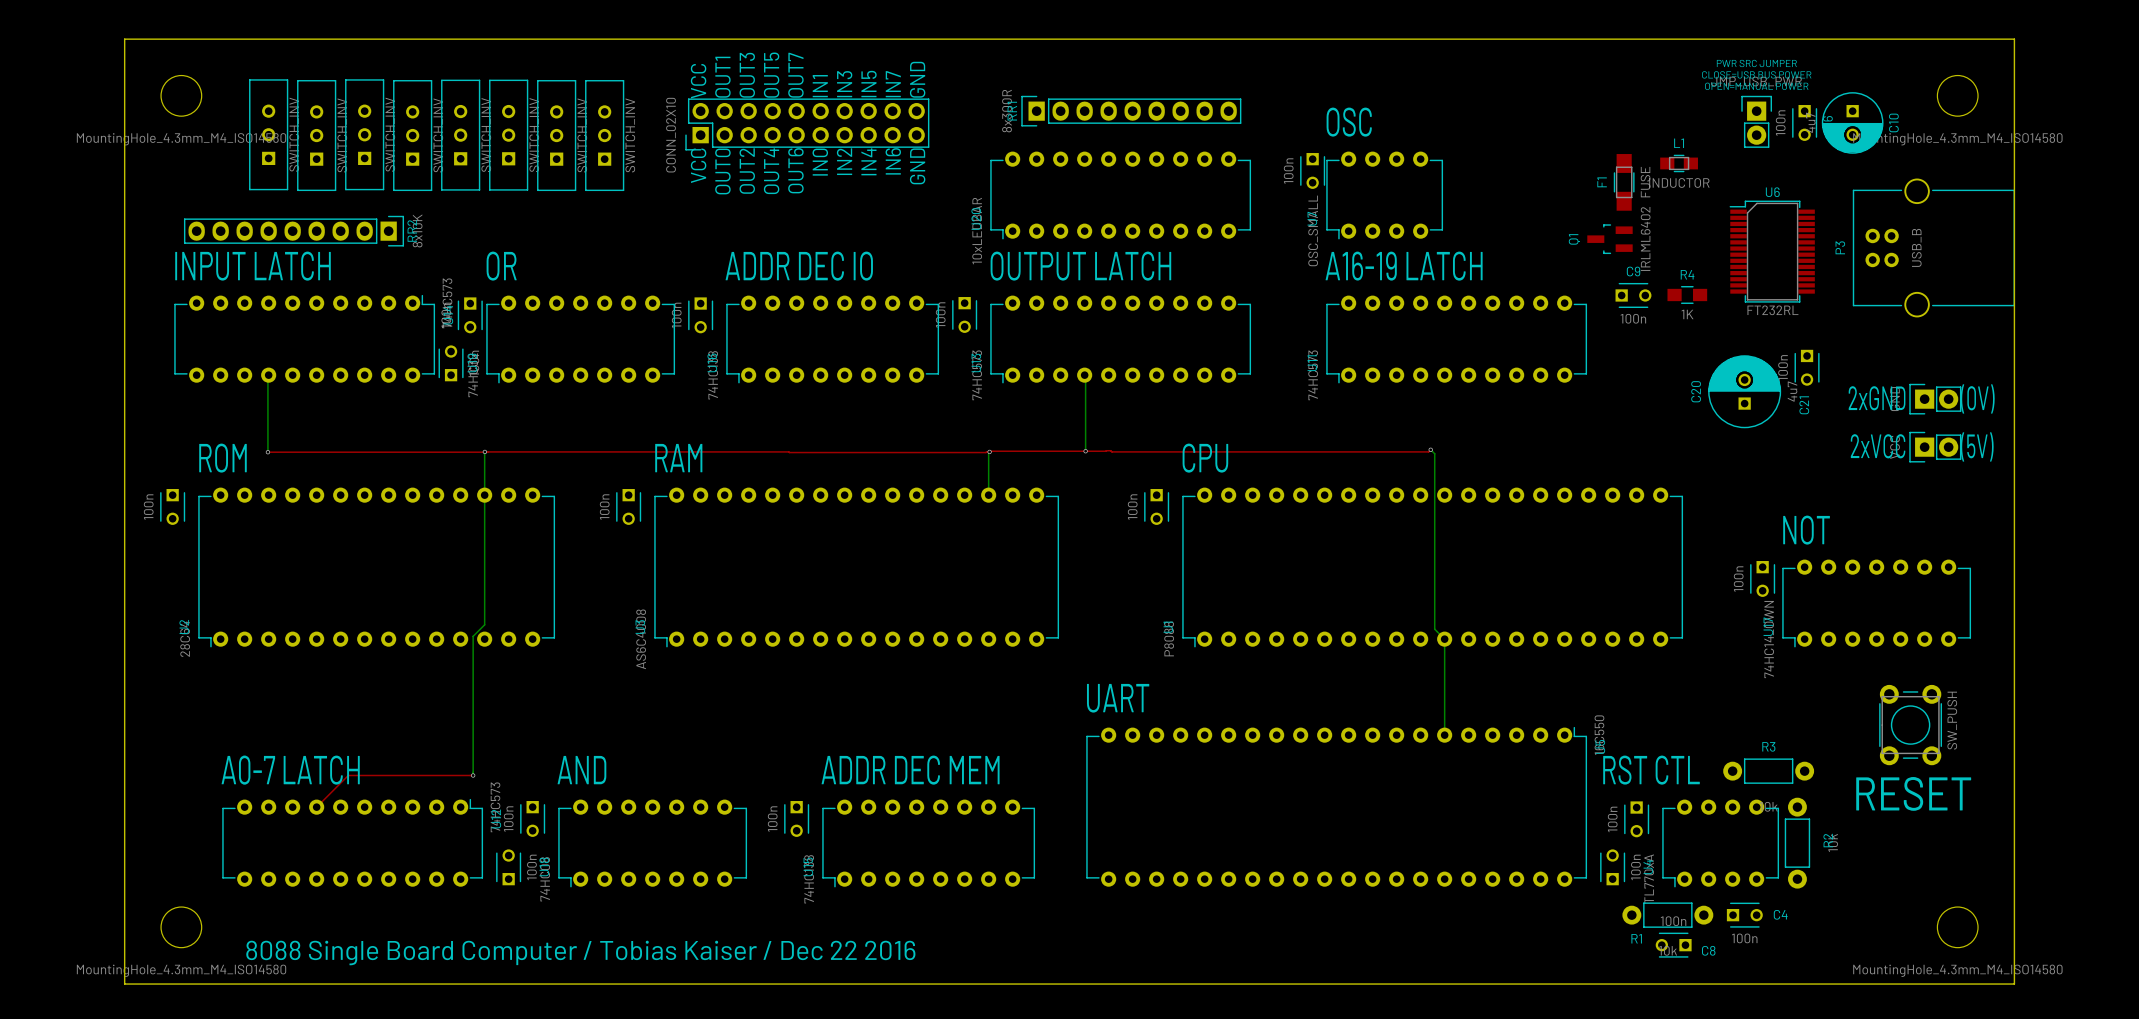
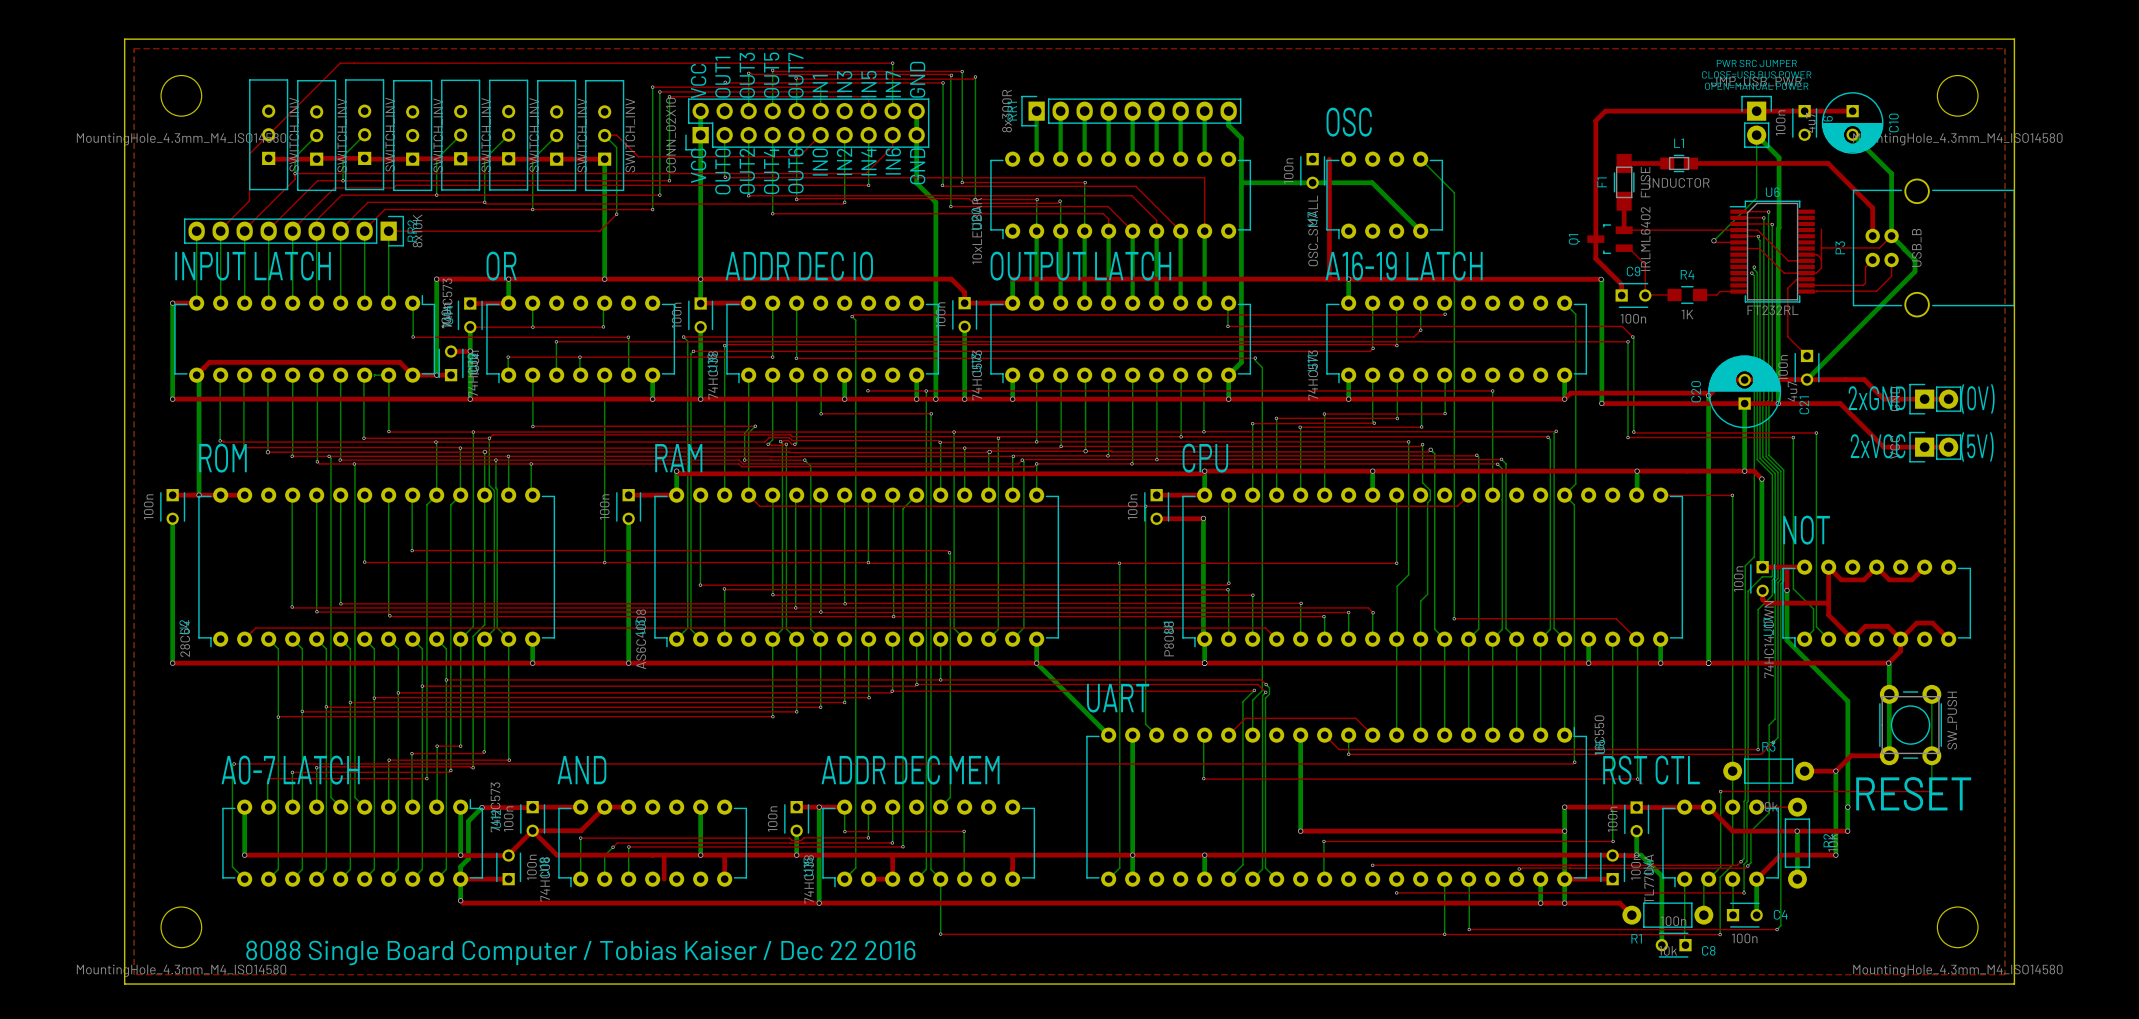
top zone outline: none -> (134, 48) (134, 974) (2004, 974) (2004, 48) (134, 48)
top track: none -> (892, 63) (340, 63) (249, 153) (249, 200) (220, 231)
bottom track: none -> (892, 63) (892, 111)
via: none -> (892, 63)
top track: none -> (772, 70) (962, 71)
bottom track: none -> (772, 70) (772, 111)
via: none -> (772, 70)
bottom track: none -> (962, 71) (962, 181)
via: none -> (962, 71)
top track: none -> (748, 73) (951, 75)
bottom track: none -> (748, 73) (748, 111)
via: none -> (748, 73)
bottom track: none -> (951, 75) (950, 206)
via: none -> (951, 75)
top track: none -> (975, 76) (973, 79) (796, 78)
bottom track: none -> (975, 76) (975, 199)
via: none -> (975, 76)
bottom track: none -> (796, 78) (796, 111)
via: none -> (796, 78)
top track: none -> (725, 82) (943, 82)
via: none -> (725, 82)
bottom track: none -> (943, 82) (942, 185)
via: none -> (943, 82)
top track: none -> (652, 87) (820, 87)
bottom track: none -> (652, 87) (652, 209)
via: none -> (652, 87)
bottom track: none -> (820, 87) (820, 111)
top track: none -> (659, 91) (844, 91)
bottom track: none -> (659, 91) (659, 195)
via: none -> (659, 91)
top track: none -> (669, 96) (865, 96) (868, 99) (868, 111)
bottom track: none -> (669, 96) (669, 180)
via: none -> (669, 96)
bottom track: none -> (700, 111) (700, 303)
bottom track: none -> (916, 111) (916, 183) (935, 202) (935, 399)
bottom track: none -> (1036, 111) (1036, 159)
bottom track: none -> (1060, 111) (1060, 159)
bottom track: none -> (1084, 111) (1084, 159)
bottom track: none -> (1108, 111) (1108, 159)
bottom track: none -> (1132, 111) (1132, 159)
bottom track: none -> (1156, 111) (1156, 159)
bottom track: none -> (1180, 111) (1180, 159)
bottom track: none -> (1204, 111) (1204, 159)
bottom track: none -> (1228, 111) (1228, 125) (1241, 138) (1241, 362) (1228, 375) (1228, 399)
top track: none -> (1852, 111) (1605, 111) (1595, 120) (1595, 258) (1621, 284) (1621, 295)
bottom track: none -> (364, 134) (343, 156) (343, 180)
bottom track: none -> (1852, 134) (1891, 173) (1891, 235) (1915, 259) (1915, 271) (1807, 379)
bottom track: none -> (316, 135) (295, 157) (295, 173)
bottom track: none -> (460, 135) (436, 159) (436, 195)
bottom track: none -> (508, 135) (484, 159) (484, 202)
bottom track: none -> (556, 135) (532, 159) (532, 209)
bottom track: none -> (604, 135) (616, 147) (616, 214)
bottom track: none -> (724, 135) (725, 177)
bottom track: none -> (748, 135) (748, 195)
bottom track: none -> (772, 135) (772, 213)
bottom track: none -> (796, 135) (796, 199)
top track: none -> (820, 135) (799, 156) (638, 156) (616, 135) (604, 135)
bottom track: none -> (844, 135) (844, 202)
bottom track: none -> (868, 135) (868, 185)
top track: none -> (892, 135) (892, 146) (865, 173) (295, 173) (295, 179) (244, 231)
top track: none -> (268, 158) (604, 159)
bottom track: none -> (604, 159) (604, 279)
top track: none -> (1329, 159) (1329, 279)
bottom track: none -> (1420, 159) (1454, 192) (1454, 618)
top track: none -> (1624, 163) (1667, 163)
top track: none -> (1690, 163) (1828, 163) (1872, 207) (1872, 235)
via: none -> (295, 173)
top track: none -> (725, 177) (1204, 177) (1204, 231)
via: none -> (725, 177)
via: none -> (343, 180)
top track: none -> (669, 180) (317, 180) (268, 231)
via: none -> (669, 180)
top track: none -> (962, 182) (1085, 182)
via: none -> (962, 182)
bottom track: none -> (1085, 182) (1084, 303)
via: none -> (1085, 182)
bottom track: none -> (1241, 184) (1242, 182) (1372, 182) (1420, 231)
top track: none -> (868, 185) (396, 185) (393, 187) (334, 187) (292, 231)
via: none -> (868, 185)
top track: none -> (942, 185) (1135, 186) (1180, 231)
via: none -> (942, 185)
via: none -> (436, 195)
top track: none -> (659, 195) (341, 195) (316, 220) (316, 231)
via: none -> (659, 195)
top track: none -> (748, 195) (1131, 195) (1156, 220) (1156, 231)
via: none -> (748, 195)
top track: none -> (796, 199) (969, 198) (973, 203) (1057, 203) (1060, 201)
via: none -> (796, 199)
top track: none -> (975, 199) (1037, 199)
via: none -> (975, 199)
bottom track: none -> (1037, 199) (1036, 303)
via: none -> (1037, 199)
bottom track: none -> (1060, 201) (1060, 303)
via: none -> (1060, 201)
top track: none -> (1624, 201) (1624, 230)
via: none -> (484, 202)
top track: none -> (844, 202) (843, 204) (486, 204) (484, 202) (368, 202) (340, 231)
via: none -> (844, 202)
top track: none -> (951, 205) (1108, 206) (1132, 231)
via: none -> (950, 206)
via: none -> (532, 209)
top track: none -> (652, 209) (384, 209) (364, 231)
via: none -> (652, 209)
top track: none -> (1738, 211) (1768, 211)
bottom track: none -> (1768, 211) (1768, 400) (1766, 402) (1766, 456) (1780, 471) (1780, 579) (1778, 582) (1778, 737) (1773, 742)
via: none -> (1768, 211)
top track: none -> (772, 213) (1103, 213) (1108, 219) (1108, 231)
via: none -> (772, 213)
top track: none -> (616, 214) (599, 231) (388, 231)
via: none -> (616, 214)
top track: none -> (1738, 217) (1763, 217)
bottom track: none -> (1763, 217) (1762, 457) (1778, 472) (1778, 578) (1775, 581) (1775, 719) (1769, 725) (1769, 812) (1750, 831) (1750, 862) (1747, 865)
via: none -> (1763, 217)
top track: none -> (1738, 223) (1772, 224)
bottom track: none -> (1772, 224) (1772, 400) (1768, 403) (1768, 455) (1783, 470) (1783, 580) (1780, 583) (1780, 925) (1777, 929)
via: none -> (1772, 224)
top track: none -> (1821, 229) (1821, 267) (1816, 273) (1784, 273) (1759, 248) (1738, 248)
top track: none -> (1624, 230) (1757, 230) (1788, 260) (1806, 260)
bottom track: none -> (196, 231) (196, 303)
bottom track: none -> (220, 231) (220, 303)
bottom track: none -> (244, 231) (244, 303)
bottom track: none -> (268, 231) (268, 303)
bottom track: none -> (292, 231) (292, 303)
bottom track: none -> (316, 231) (316, 303)
bottom track: none -> (340, 231) (340, 303)
bottom track: none -> (364, 231) (364, 303)
bottom track: none -> (388, 231) (388, 303)
bottom track: none -> (1108, 231) (1108, 303)
bottom track: none -> (1132, 231) (1132, 303)
bottom track: none -> (1156, 231) (1156, 303)
bottom track: none -> (1180, 231) (1180, 303)
bottom track: none -> (1204, 231) (1204, 303)
top track: none -> (1891, 235) (1879, 247) (1821, 247)
top track: none -> (1738, 236) (1758, 236)
bottom track: none -> (1758, 236) (1760, 240) (1760, 458) (1775, 473) (1775, 577) (1772, 580) (1772, 595) (1758, 609) (1758, 749)
via: none -> (1758, 236)
top track: none -> (1713, 240) (1715, 242) (1738, 242)
bottom track: none -> (1713, 240) (1756, 198) (1756, 135) (1779, 157) (1778, 403)
via: none -> (1713, 240)
top track: none -> (1624, 248) (1628, 248) (1645, 264) (1645, 295) (1674, 294)
top track: none -> (1806, 254) (1817, 254) (1821, 258)
top track: none -> (1872, 259) (1865, 267) (1865, 283) (1863, 285) (1806, 285)
top track: none -> (1891, 259) (1891, 276) (1876, 291) (1806, 291)
via: none -> (1754, 267)
bottom track: none -> (1754, 269) (1754, 267) (1757, 272) (1757, 459) (1772, 474) (1772, 576) (1762, 576) (1748, 591) (1748, 801) (1746, 861) (1744, 864) (1744, 892)
bottom track: none -> (1751, 273) (1754, 275) (1754, 556) (1745, 565) (1745, 800) (1744, 858) (1741, 861)
via: none -> (1751, 273)
top track: none -> (436, 279) (951, 279) (964, 292) (964, 303) (1012, 303)
bottom track: none -> (436, 279) (436, 375)
via: none -> (436, 279)
bottom track: none -> (508, 279) (508, 303)
via: none -> (508, 279)
via: none -> (604, 279)
via: none -> (700, 279)
top track: none -> (1012, 279) (1601, 279)
bottom track: none -> (1012, 279) (1012, 303)
bottom track: none -> (1348, 279) (1348, 303)
via: none -> (1348, 279)
bottom track: none -> (1601, 279) (1601, 403)
via: none -> (1601, 279)
top track: none -> (1806, 279) (1796, 279) (1787, 288) (1787, 336) (1807, 355)
top track: none -> (1738, 291) (1720, 291) (1716, 294) (1700, 294)
top track: none -> (172, 303) (196, 303)
bottom track: none -> (172, 303) (172, 399)
via: none -> (172, 303)
bottom track: none -> (412, 303) (413, 336)
top track: none -> (508, 303) (470, 303)
bottom track: none -> (532, 303) (532, 327)
bottom track: none -> (604, 303) (603, 326)
top track: none -> (748, 303) (700, 303)
bottom track: none -> (772, 303) (772, 357)
bottom track: none -> (796, 303) (796, 358)
bottom track: none -> (1228, 303) (1227, 326)
bottom track: none -> (1372, 303) (1373, 348)
bottom track: none -> (1396, 303) (1396, 345)
bottom track: none -> (1420, 303) (1420, 330)
bottom track: none -> (1564, 303) (1575, 314) (1575, 484) (1564, 495) (1574, 504) (1574, 762)
top track: none -> (1445, 314) (853, 314) (852, 316)
via: none -> (1445, 314)
bottom track: none -> (852, 316) (855, 320) (855, 868) (844, 879)
via: none -> (852, 316)
top track: none -> (603, 326) (470, 327)
via: none -> (603, 326)
bottom track: none -> (964, 326) (964, 399)
top track: none -> (1227, 326) (1622, 326) (1632, 336)
via: none -> (1227, 326)
bottom track: none -> (470, 327) (470, 399)
via: none -> (532, 327)
bottom track: none -> (700, 327) (700, 399)
top track: none -> (1420, 330) (1413, 336) (683, 336)
via: none -> (1420, 330)
top track: none -> (413, 336) (628, 337)
via: none -> (413, 336)
bottom track: none -> (683, 336) (687, 341) (687, 628) (676, 639)
via: none -> (683, 336)
bottom track: none -> (1632, 336) (1633, 432)
via: none -> (1632, 336)
bottom track: none -> (628, 337) (628, 375)
via: none -> (628, 337)
top track: none -> (556, 341) (1628, 341)
bottom track: none -> (556, 341) (556, 375)
via: none -> (556, 341)
bottom track: none -> (1628, 341) (1628, 437)
via: none -> (1628, 341)
top track: none -> (724, 345) (1396, 345)
bottom track: none -> (724, 345) (724, 495)
via: none -> (724, 345)
via: none -> (1396, 345)
top track: none -> (1373, 348) (1370, 351) (693, 351)
via: none -> (1373, 348)
top track: none -> (470, 351) (451, 351)
via: none -> (470, 351)
bottom track: none -> (693, 351) (690, 353) (690, 629) (700, 639)
via: none -> (693, 351)
top track: none -> (508, 357) (772, 357)
bottom track: none -> (508, 357) (508, 375)
via: none -> (508, 357)
bottom track: none -> (579, 357) (580, 375)
via: none -> (579, 357)
via: none -> (772, 357)
via: none -> (796, 358)
top track: none -> (1255, 358) (796, 358)
bottom track: none -> (1255, 358) (1262, 367) (1262, 690) (1252, 700) (1252, 735)
via: none -> (1255, 358)
top track: none -> (196, 375) (209, 362) (399, 362) (412, 375) (451, 375)
bottom track: none -> (196, 375) (199, 377) (199, 495)
bottom track: none -> (220, 375) (220, 440)
bottom track: none -> (244, 375) (243, 447)
bottom track: none -> (292, 375) (292, 456)
bottom track: none -> (316, 375) (317, 461)
bottom track: none -> (340, 375) (340, 460)
bottom track: none -> (364, 375) (363, 438)
via: none -> (436, 375)
bottom track: none -> (532, 375) (532, 426)
bottom track: none -> (604, 375) (604, 562)
bottom track: none -> (652, 375) (652, 399)
bottom track: none -> (748, 375) (748, 428) (744, 433) (744, 460)
bottom track: none -> (772, 375) (772, 439) (768, 444)
bottom track: none -> (796, 375) (796, 442) (794, 444)
bottom track: none -> (820, 375) (821, 413)
bottom track: none -> (844, 375) (844, 399)
bottom track: none -> (916, 375) (916, 399)
bottom track: none -> (1012, 375) (1012, 399)
bottom track: none -> (1036, 375) (1036, 441)
bottom track: none -> (1060, 375) (1061, 446)
bottom track: none -> (1108, 375) (1107, 455)
bottom track: none -> (1132, 375) (1131, 463)
bottom track: none -> (1156, 375) (1156, 459)
bottom track: none -> (1180, 375) (1181, 436)
bottom track: none -> (1204, 375) (1203, 431)
bottom track: none -> (1348, 375) (1348, 399)
bottom track: none -> (1372, 375) (1372, 421) (1374, 423)
bottom track: none -> (1396, 375) (1397, 418)
bottom track: none -> (1420, 375) (1421, 426)
bottom track: none -> (1444, 375) (1445, 413)
bottom track: none -> (1564, 375) (1564, 399)
bottom track: none -> (374, 376) (374, 374) (388, 375) (388, 431)
top track: none -> (867, 390) (1492, 390)
via: none -> (867, 390)
via: none -> (926, 390)
bottom track: none -> (1492, 390) (1492, 495)
via: none -> (1492, 390)
bottom track: none -> (926, 391) (926, 869) (916, 879)
bottom track: none -> (1708, 395) (1708, 663)
via: none -> (1708, 395)
top track: none -> (172, 399) (1564, 399) (1570, 393) (1706, 393) (1708, 395) (1724, 379) (1745, 379) (1864, 379) (1883, 399) (1948, 399)
via: none -> (172, 399)
via: none -> (470, 399)
via: none -> (652, 399)
via: none -> (700, 399)
via: none -> (844, 399)
via: none -> (916, 399)
via: none -> (935, 399)
via: none -> (964, 399)
via: none -> (1012, 399)
via: none -> (1228, 399)
via: none -> (1348, 399)
via: none -> (1564, 399)
top track: none -> (1601, 403) (1840, 403) (1883, 447) (1948, 447)
via: none -> (1601, 403)
bottom track: none -> (1744, 403) (1744, 471)
via: none -> (1778, 403)
top track: none -> (821, 413) (931, 413)
via: none -> (821, 413)
bottom track: none -> (931, 413) (930, 869) (940, 879) (940, 934)
via: none -> (931, 413)
top track: none -> (1445, 413) (1324, 414)
via: none -> (1445, 413)
bottom track: none -> (1324, 414) (1324, 495)
via: none -> (1324, 414)
top track: none -> (1276, 418) (1397, 418)
bottom track: none -> (1276, 418) (1276, 495)
via: none -> (1276, 418)
via: none -> (1397, 418)
bottom track: none -> (1252, 423) (1252, 495)
via: none -> (1252, 423)
top track: none -> (1374, 423) (1252, 423)
via: none -> (1374, 423)
via: none -> (532, 426)
top track: none -> (755, 426) (532, 426)
bottom track: none -> (755, 426) (748, 432) (748, 495)
via: none -> (755, 426)
top track: none -> (1421, 426) (1300, 427)
via: none -> (1421, 426)
bottom track: none -> (1300, 427) (1300, 495)
via: none -> (1300, 427)
via: none -> (388, 431)
via: none -> (1203, 431)
top track: none -> (1556, 431) (388, 431)
bottom track: none -> (1556, 431) (1554, 433) (1554, 628) (1564, 639) (1564, 735)
via: none -> (1556, 431)
bottom track: none -> (473, 432) (473, 626) (460, 639) (460, 746)
via: none -> (473, 432)
bottom track: none -> (954, 432) (954, 628) (964, 639)
via: none -> (954, 432)
top track: none -> (1633, 432) (1816, 432)
via: none -> (1633, 432)
bottom track: none -> (1816, 432) (1816, 626) (1828, 639)
via: none -> (1816, 432)
top track: none -> (792, 436) (790, 434) (492, 434) (489, 438) (363, 438)
top track: none -> (792, 436) (1548, 437)
via: none -> (1181, 436)
bottom track: none -> (1548, 437) (1550, 439) (1550, 629) (1540, 639)
via: none -> (1548, 437)
top track: none -> (1628, 437) (1793, 437)
via: none -> (1628, 437)
bottom track: none -> (1793, 437) (1793, 588) (1813, 609) (1813, 630) (1804, 639)
via: none -> (1793, 437)
via: none -> (363, 438)
bottom track: none -> (489, 438) (489, 485) (494, 490) (494, 629) (484, 639) (484, 751)
via: none -> (489, 438)
bottom track: none -> (998, 438) (998, 629) (988, 639)
via: none -> (998, 438)
top track: none -> (220, 440) (764, 442) (769, 437) (789, 437) (792, 440) (938, 440) (940, 442) (1408, 441)
via: none -> (220, 440)
top track: none -> (780, 441) (788, 440) (794, 444)
bottom track: none -> (780, 441) (782, 443) (782, 629) (772, 639) (772, 716)
via: none -> (780, 441)
via: none -> (1036, 441)
bottom track: none -> (1408, 441) (1408, 574) (1397, 586) (1396, 735)
via: none -> (1408, 441)
bottom track: none -> (435, 442) (436, 495) (426, 504) (426, 778)
via: none -> (435, 442)
bottom track: none -> (940, 442) (940, 495)
via: none -> (940, 442)
top track: none -> (768, 444) (786, 444)
via: none -> (768, 444)
bottom track: none -> (786, 444) (786, 628) (796, 639) (796, 711)
via: none -> (786, 444)
via: none -> (794, 444)
top track: none -> (1422, 444) (1420, 446) (1061, 446) (1059, 448) (243, 447)
bottom track: none -> (1422, 444) (1422, 482) (1430, 490) (1430, 499) (1427, 502) (1427, 594) (1420, 601) (1420, 735)
via: none -> (1422, 444)
via: none -> (1061, 446)
bottom track: none -> (460, 448) (460, 495) (450, 504) (450, 770)
via: none -> (460, 448)
bottom track: none -> (964, 448) (964, 495)
via: none -> (964, 448)
via: none -> (1107, 455)
top track: none -> (1476, 455) (292, 456)
bottom track: none -> (1476, 455) (1478, 457) (1478, 629) (1468, 639) (1468, 735)
via: none -> (1476, 455)
via: none -> (292, 456)
bottom track: none -> (329, 456) (330, 458) (330, 797) (340, 807)
via: none -> (329, 456)
bottom track: none -> (508, 456) (508, 495)
via: none -> (508, 456)
bottom track: none -> (1013, 456) (1012, 495)
via: none -> (1013, 456)
via: none -> (1156, 459)
top track: none -> (1501, 459) (1022, 459) (1018, 463) (742, 463) (739, 460) (340, 460)
bottom track: none -> (1501, 459) (1506, 463) (1506, 628) (1516, 639) (1516, 735)
via: none -> (1501, 459)
via: none -> (340, 460)
bottom track: none -> (495, 460) (497, 627) (508, 639) (509, 760)
via: none -> (495, 460)
top track: none -> (744, 460) (770, 460)
via: none -> (744, 460)
top track: none -> (770, 460) (802, 460)
bottom track: none -> (804, 460) (810, 466) (810, 629) (820, 639) (820, 707)
via: none -> (804, 460)
bottom track: none -> (1022, 460) (1023, 461) (1023, 627) (1012, 639)
via: none -> (1022, 460)
top track: none -> (317, 461) (319, 463) (738, 463) (741, 466) (1033, 466) (1036, 463) (1497, 464)
via: none -> (317, 461)
bottom track: none -> (354, 463) (354, 797) (364, 807)
via: none -> (354, 463)
bottom track: none -> (531, 463) (532, 495)
via: none -> (531, 463)
bottom track: none -> (1036, 463) (1036, 495)
via: none -> (1036, 463)
via: none -> (1131, 463)
bottom track: none -> (1497, 464) (1502, 468) (1502, 499)
via: none -> (1497, 464)
top track: none -> (676, 471) (679, 473) (1754, 471) (1761, 479)
bottom track: none -> (676, 471) (676, 495)
via: none -> (676, 471)
bottom track: none -> (1204, 471) (1204, 495)
via: none -> (1204, 471)
bottom track: none -> (1372, 471) (1372, 495)
via: none -> (1372, 471)
bottom track: none -> (1637, 471) (1636, 495)
via: none -> (1637, 471)
via: none -> (1744, 471)
bottom track: none -> (1761, 479) (1762, 567)
via: none -> (1761, 479)
top track: none -> (172, 495) (244, 495)
via: none -> (199, 495)
bottom track: none -> (292, 495) (292, 606)
bottom track: none -> (316, 495) (316, 611)
bottom track: none -> (340, 495) (340, 603)
bottom track: none -> (364, 495) (364, 562)
bottom track: none -> (388, 495) (389, 615)
bottom track: none -> (412, 495) (412, 550)
top track: none -> (628, 495) (676, 495)
bottom track: none -> (700, 495) (700, 585)
top track: none -> (748, 495) (759, 506) (1457, 506) (1468, 495)
bottom track: none -> (772, 495) (772, 594)
bottom track: none -> (796, 495) (795, 607)
bottom track: none -> (820, 495) (820, 612)
bottom track: none -> (844, 495) (845, 603)
bottom track: none -> (868, 495) (868, 562)
bottom track: none -> (892, 495) (893, 616)
bottom track: none -> (916, 495) (902, 508) (902, 846)
top track: none -> (1156, 495) (1204, 495)
bottom track: none -> (1228, 495) (1228, 583)
bottom track: none -> (1396, 495) (1396, 563)
top track: none -> (1660, 495) (1732, 495)
bottom track: none -> (1732, 495) (1732, 864) (1720, 877) (1720, 934)
via: none -> (1732, 495)
bottom track: none -> (1502, 499) (1502, 629) (1492, 639)
bottom track: none -> (1145, 506) (1145, 724) (1156, 735)
via: none -> (1145, 506)
bottom track: none -> (172, 518) (172, 663)
bottom track: none -> (628, 518) (628, 663)
top track: none -> (1203, 518) (1156, 518)
bottom track: none -> (1203, 518) (1204, 663)
via: none -> (1203, 518)
top track: none -> (412, 550) (947, 550) (949, 552)
via: none -> (412, 550)
bottom track: none -> (949, 552) (950, 797) (940, 807)
via: none -> (949, 552)
top track: none -> (364, 562) (1396, 563)
via: none -> (364, 562)
via: none -> (604, 562)
via: none -> (868, 562)
bottom track: none -> (1119, 563) (1119, 868) (1108, 879)
via: none -> (1119, 563)
via: none -> (1396, 563)
top track: none -> (1762, 567) (1804, 567)
top track: none -> (1786, 567) (1786, 590)
top track: none -> (1924, 567) (1911, 579) (1889, 579) (1876, 567) (1863, 579) (1841, 579) (1828, 567) (1828, 615) (1852, 639) (1865, 626) (1887, 626) (1900, 639)
top track: none -> (1228, 583) (1226, 585) (700, 585)
via: none -> (1228, 583)
via: none -> (700, 585)
top track: none -> (724, 588) (1227, 589)
bottom track: none -> (724, 588) (724, 639)
via: none -> (724, 588)
bottom track: none -> (1227, 589) (1228, 639)
via: none -> (1227, 589)
top track: none -> (1762, 590) (1762, 599) (1766, 603) (1828, 603)
bottom track: none -> (1786, 590) (1786, 640) (1847, 701) (1847, 831)
via: none -> (1786, 590)
top track: none -> (772, 594) (1252, 595)
via: none -> (772, 594)
bottom track: none -> (1252, 595) (1252, 639)
via: none -> (1252, 595)
via: none -> (340, 603)
via: none -> (845, 603)
top track: none -> (1301, 603) (340, 603)
bottom track: none -> (1301, 603) (1300, 639)
via: none -> (1301, 603)
top track: none -> (292, 606) (1368, 607) (1373, 612)
via: none -> (292, 606)
via: none -> (795, 607)
top track: none -> (316, 611) (1348, 612)
via: none -> (316, 611)
via: none -> (820, 612)
bottom track: none -> (1348, 612) (1348, 639)
via: none -> (1348, 612)
bottom track: none -> (1373, 612) (1372, 639)
via: none -> (1373, 612)
top track: none -> (389, 615) (1323, 616)
via: none -> (389, 615)
via: none -> (893, 616)
bottom track: none -> (1323, 616) (1324, 639)
via: none -> (1323, 616)
top track: none -> (1454, 618) (1616, 618) (1636, 639)
via: none -> (1454, 618)
top track: none -> (244, 639) (255, 628) (1265, 628) (1276, 639)
bottom track: none -> (268, 639) (278, 648) (278, 869) (268, 879)
bottom track: none -> (292, 639) (302, 648) (302, 869) (292, 879)
bottom track: none -> (316, 639) (326, 648) (326, 869) (316, 879)
bottom track: none -> (340, 639) (350, 648) (350, 869) (340, 879)
bottom track: none -> (364, 639) (374, 648) (374, 869) (364, 879)
bottom track: none -> (388, 639) (398, 648) (398, 869) (388, 879)
bottom track: none -> (412, 639) (422, 648) (422, 869) (412, 879)
bottom track: none -> (436, 639) (446, 648) (446, 869) (436, 879)
bottom track: none -> (532, 639) (532, 663)
bottom track: none -> (844, 639) (844, 702)
bottom track: none -> (868, 639) (869, 697)
bottom track: none -> (892, 639) (892, 691)
bottom track: none -> (916, 639) (916, 684)
bottom track: none -> (940, 639) (940, 679)
bottom track: none -> (1036, 639) (1036, 663) (1108, 735)
bottom track: none -> (1492, 639) (1492, 735)
bottom track: none -> (1540, 639) (1540, 735)
bottom track: none -> (1588, 639) (1588, 663)
bottom track: none -> (1612, 639) (1613, 841)
bottom track: none -> (1636, 639) (1637, 779)
bottom track: none -> (1660, 639) (1660, 663)
top track: none -> (1900, 639) (1900, 651) (1888, 663) (172, 663)
top track: none -> (1900, 639) (1916, 623) (1932, 623) (1948, 639)
via: none -> (172, 663)
via: none -> (532, 663)
via: none -> (628, 663)
via: none -> (1036, 663)
via: none -> (1204, 663)
via: none -> (1588, 663)
via: none -> (1660, 663)
via: none -> (1708, 663)
bottom track: none -> (1888, 663) (1889, 755)
via: none -> (1888, 663)
top track: none -> (446, 679) (1261, 679) (1266, 684)
via: none -> (446, 679)
via: none -> (940, 679)
via: none -> (916, 684)
bottom track: none -> (1266, 684) (1269, 687) (1269, 694) (1265, 698) (1265, 867) (1276, 879)
via: none -> (1266, 684)
top track: none -> (422, 686) (1257, 684) (1265, 692)
via: none -> (422, 686)
top track: none -> (1254, 690) (398, 692)
bottom track: none -> (1254, 690) (1242, 701) (1242, 864) (1228, 879)
via: none -> (1254, 690)
via: none -> (892, 691)
via: none -> (398, 692)
bottom track: none -> (1265, 692) (1262, 695) (1262, 869) (1252, 879)
via: none -> (1265, 692)
bottom track: none -> (1931, 694) (1931, 791)
top track: none -> (869, 697) (374, 698)
via: none -> (869, 697)
via: none -> (374, 698)
top track: none -> (350, 702) (844, 702)
via: none -> (350, 702)
via: none -> (844, 702)
top track: none -> (326, 706) (820, 707)
via: none -> (326, 706)
via: none -> (820, 707)
top track: none -> (302, 711) (796, 711)
via: none -> (302, 711)
via: none -> (796, 711)
top track: none -> (772, 716) (278, 717)
via: none -> (772, 716)
via: none -> (278, 717)
bottom track: none -> (1132, 735) (1132, 879)
bottom track: none -> (1204, 735) (1203, 778)
top track: none -> (1228, 735) (1245, 718) (1355, 718) (1372, 735)
bottom track: none -> (1300, 735) (1300, 831)
top track: none -> (1324, 735) (1339, 749) (1758, 749)
bottom track: none -> (1348, 735) (1348, 754)
top track: none -> (1773, 742) (1761, 754) (1348, 754)
via: none -> (1773, 742)
top track: none -> (437, 746) (460, 746)
bottom track: none -> (437, 746) (436, 807)
via: none -> (437, 746)
via: none -> (460, 746)
via: none -> (1758, 749)
top track: none -> (484, 751) (482, 753) (411, 753)
via: none -> (484, 751)
bottom track: none -> (411, 753) (412, 807)
via: none -> (411, 753)
via: none -> (1348, 754)
top track: none -> (1888, 756) (1851, 755) (1835, 771) (1804, 771)
top track: none -> (389, 760) (509, 760)
bottom track: none -> (389, 760) (388, 807)
via: none -> (389, 760)
via: none -> (509, 760)
top track: none -> (1574, 762) (1573, 763) (234, 763)
via: none -> (1574, 762)
bottom track: none -> (234, 763) (232, 765) (232, 866) (244, 879)
via: none -> (234, 763)
top track: none -> (316, 767) (473, 767)
bottom track: none -> (316, 767) (316, 807)
via: none -> (316, 767)
bottom track: (473, 767) (473, 775) -> none
via: none -> (473, 767)
top track: none -> (450, 770) (449, 772) (292, 772)
via: none -> (450, 770)
bottom track: none -> (1835, 771) (1835, 855)
via: none -> (1835, 771)
bottom track: none -> (292, 772) (292, 807)
via: none -> (292, 772)
top track: (473, 775) (348, 775) (316, 807) -> none
via: (473, 775) -> none
top track: none -> (426, 778) (267, 779)
via: none -> (426, 778)
top track: none -> (1203, 778) (1637, 779) (1642, 784)
via: none -> (1203, 778)
bottom track: none -> (267, 779) (268, 807)
via: none -> (1637, 779)
top track: none -> (1720, 791) (1931, 791)
bottom track: none -> (1720, 791) (1720, 867) (1703, 883) (1703, 915)
via: none -> (1720, 791)
bottom track: none -> (244, 807) (244, 855)
bottom track: none -> (460, 807) (460, 855)
bottom track: none -> (482, 807) (468, 821) (468, 858) (460, 866) (460, 900)
via: none -> (482, 807)
top track: none -> (580, 807) (482, 807)
top track: none -> (628, 807) (604, 807) (581, 830) (532, 830)
bottom track: none -> (700, 807) (700, 855)
top track: none -> (796, 807) (844, 807)
bottom track: none -> (819, 807) (819, 903)
via: none -> (819, 807)
bottom track: none -> (844, 807) (844, 831)
bottom track: none -> (868, 807) (868, 837)
bottom track: none -> (892, 807) (892, 842)
top track: none -> (1564, 807) (1708, 807) (1732, 831) (1847, 831)
bottom track: none -> (1564, 807) (1564, 903)
via: none -> (1564, 807)
top track: none -> (1756, 807) (1797, 807)
via: none -> (1847, 807)
top track: none -> (532, 830) (557, 855) (1636, 855)
top track: none -> (532, 830) (508, 855)
bottom track: none -> (796, 830) (796, 855)
via: none -> (844, 831)
top track: none -> (964, 831) (844, 831)
bottom track: none -> (964, 831) (964, 879)
via: none -> (964, 831)
top track: none -> (1300, 831) (1564, 831)
via: none -> (1300, 831)
via: none -> (1564, 831)
bottom track: none -> (1636, 831) (1636, 855) (1640, 855) (1661, 876) (1661, 945)
bottom track: none -> (1797, 831) (1797, 879)
via: none -> (1797, 831)
via: none -> (1847, 831)
top track: none -> (868, 837) (803, 837) (801, 840) (792, 840) (789, 838) (580, 838)
via: none -> (868, 837)
bottom track: none -> (580, 838) (580, 879)
via: none -> (580, 838)
top track: none -> (1323, 841) (1613, 841)
bottom track: none -> (1323, 841) (1324, 879)
via: none -> (1323, 841)
via: none -> (1613, 841)
top track: none -> (892, 842) (617, 842) (613, 847)
via: none -> (892, 842)
bottom track: none -> (628, 846) (628, 879)
via: none -> (628, 846)
top track: none -> (902, 846) (628, 846)
via: none -> (902, 846)
bottom track: none -> (613, 847) (604, 855) (604, 879)
via: none -> (613, 847)
top track: none -> (244, 855) (508, 855)
via: none -> (244, 855)
via: none -> (460, 855)
top track: none -> (664, 855) (664, 879)
via: none -> (700, 855)
top track: none -> (724, 855) (724, 879)
via: none -> (796, 855)
top track: none -> (892, 855) (892, 879) (868, 879)
top track: none -> (1012, 855) (1012, 879)
via: none -> (1132, 855)
bottom track: none -> (1204, 855) (1204, 879)
via: none -> (1204, 855)
via: none -> (1636, 855)
top track: none -> (1835, 855) (1780, 855) (1756, 879)
via: none -> (1835, 855)
top track: none -> (1741, 861) (1737, 865) (1372, 865)
via: none -> (1741, 861)
via: none -> (1372, 865)
top track: none -> (1747, 865) (1745, 868) (1519, 868)
via: none -> (1747, 865)
via: none -> (1519, 868)
top track: none -> (460, 879) (508, 879)
bottom track: none -> (1444, 879) (1444, 934)
bottom track: none -> (1468, 879) (1469, 929)
bottom track: none -> (1540, 879) (1540, 903)
top track: none -> (1564, 879) (1612, 879)
bottom track: none -> (1684, 879) (1685, 945)
bottom track: none -> (1732, 879) (1733, 915)
bottom track: none -> (1756, 879) (1756, 915)
top track: none -> (1396, 892) (1744, 892)
via: none -> (1396, 892)
via: none -> (1744, 892)
top track: none -> (460, 900) (463, 903) (1619, 903) (1631, 915)
via: none -> (460, 900)
via: none -> (819, 903)
via: none -> (1540, 903)
via: none -> (1564, 903)
top track: none -> (1469, 929) (1777, 929)
via: none -> (1469, 929)
via: none -> (1777, 929)
top track: none -> (940, 934) (1720, 934)
via: none -> (940, 934)
via: none -> (1444, 934)
via: none -> (1720, 934)

